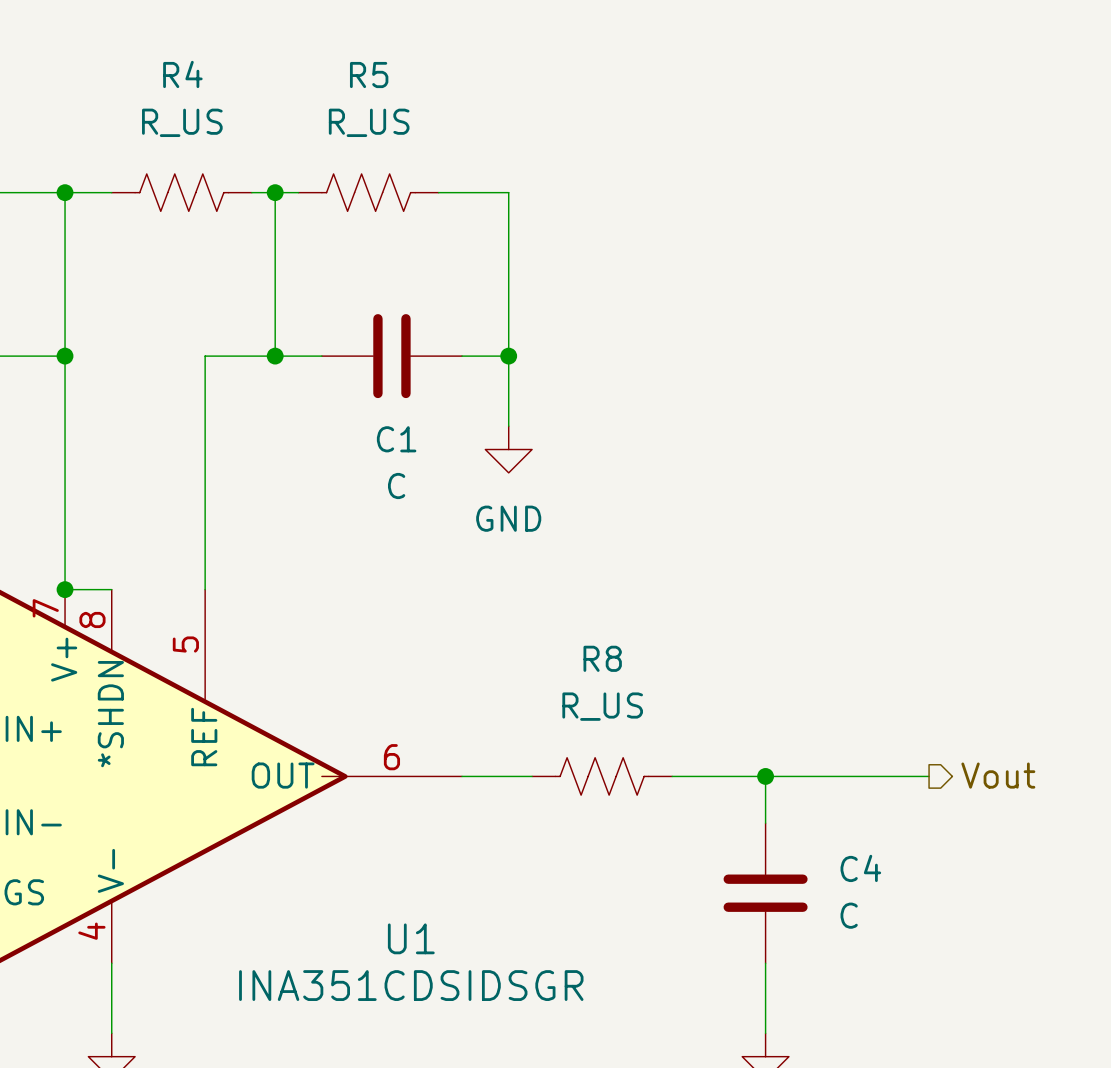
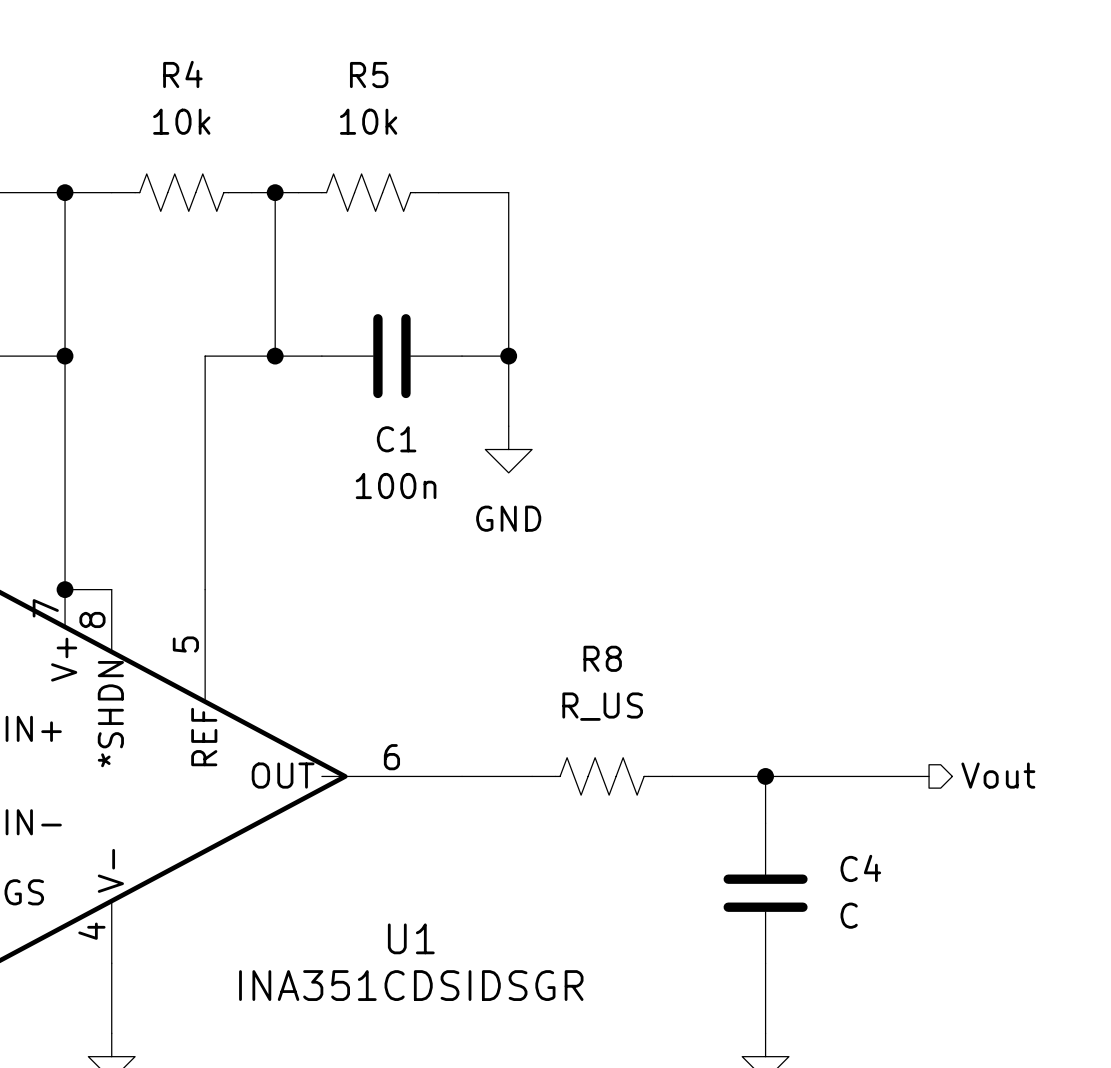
R4 value: R_US (182, 122) -> 10k (181, 121)
R5 value: R_US (369, 122) -> 10k (368, 121)
C1 value: C (396, 486) -> 100n (396, 486)

